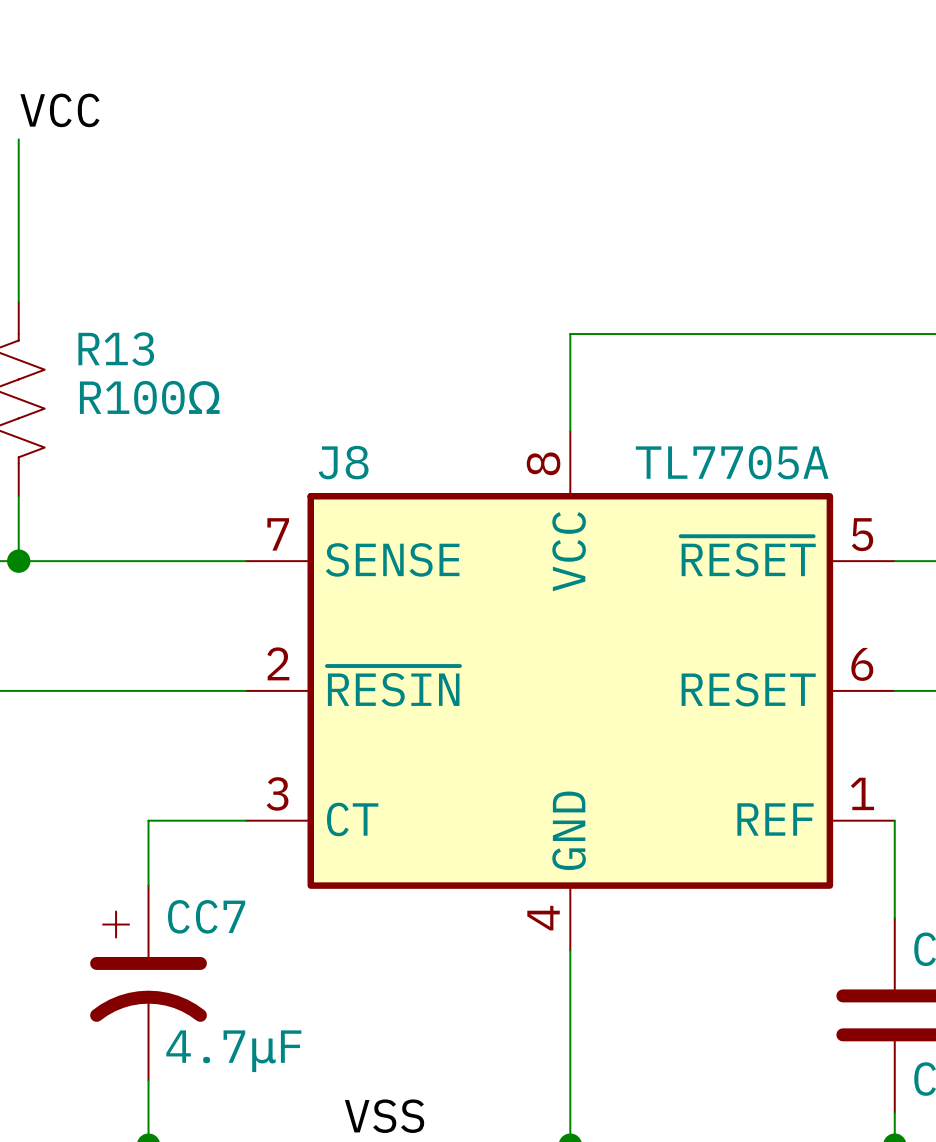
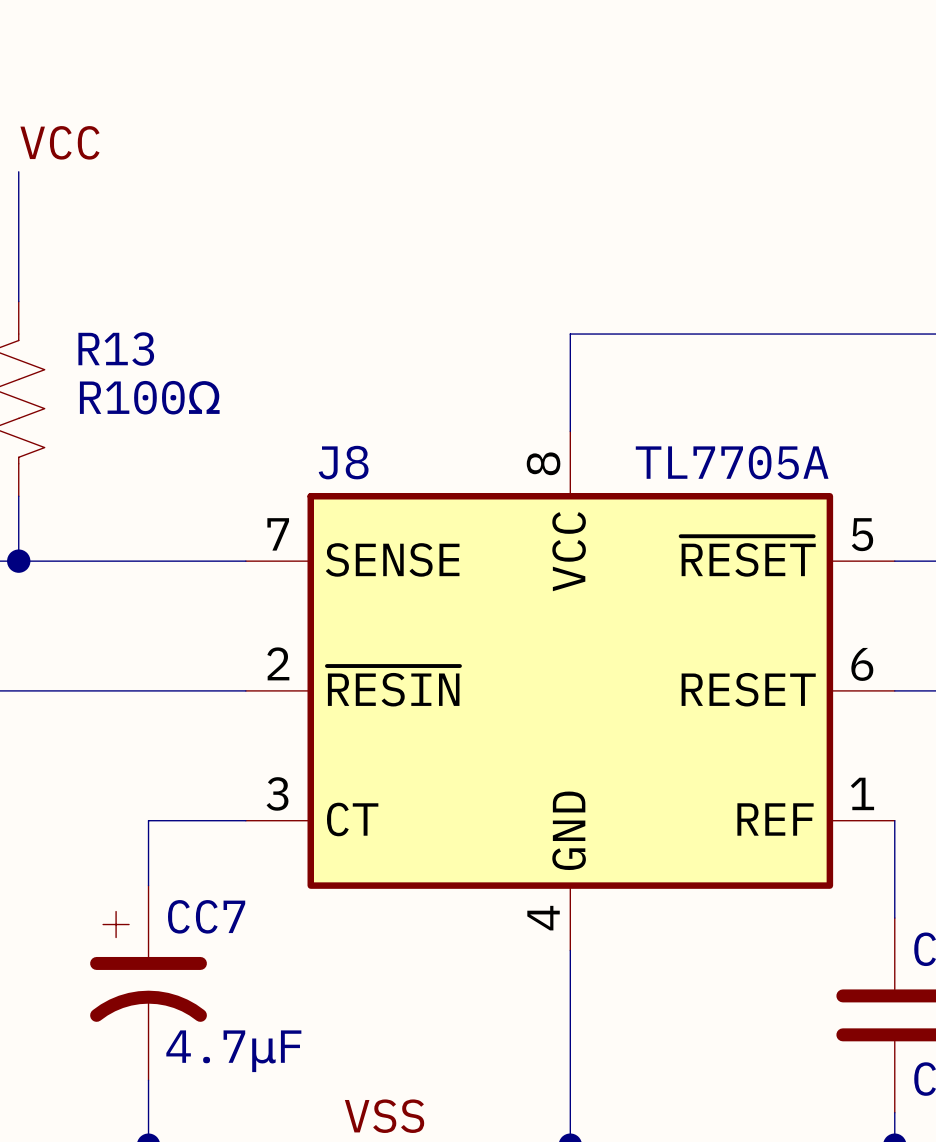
label position: VCC (59, 110) -> VCC (59, 142)
wire: (18, 139) (18, 171) -> none

